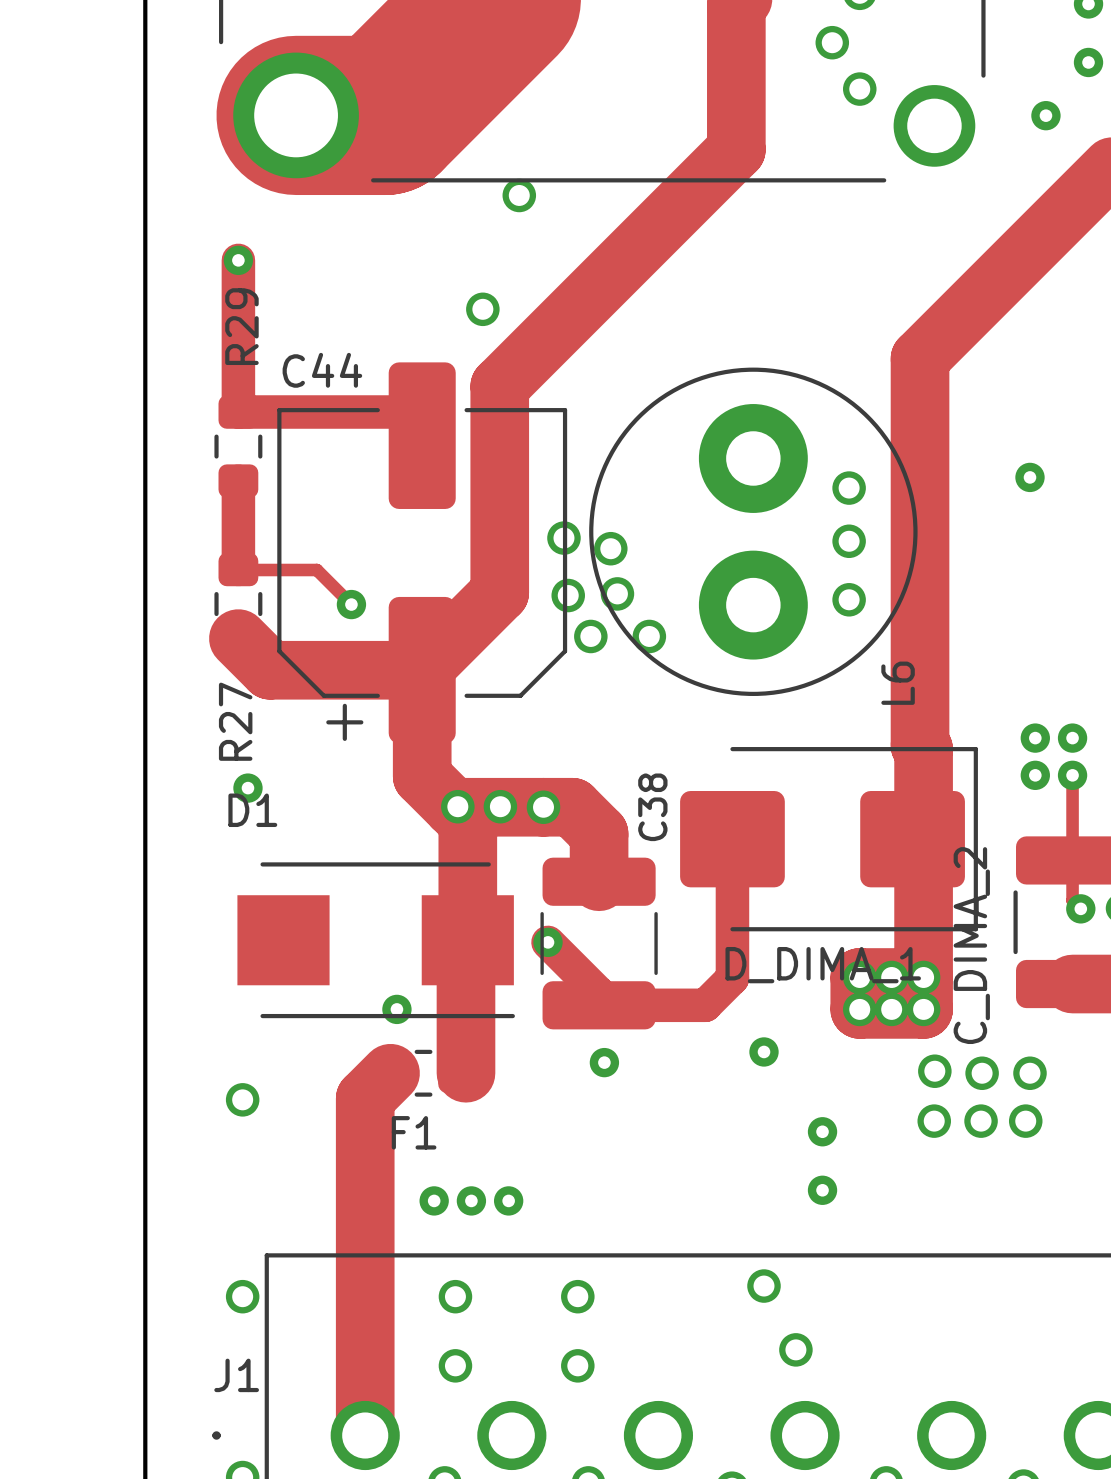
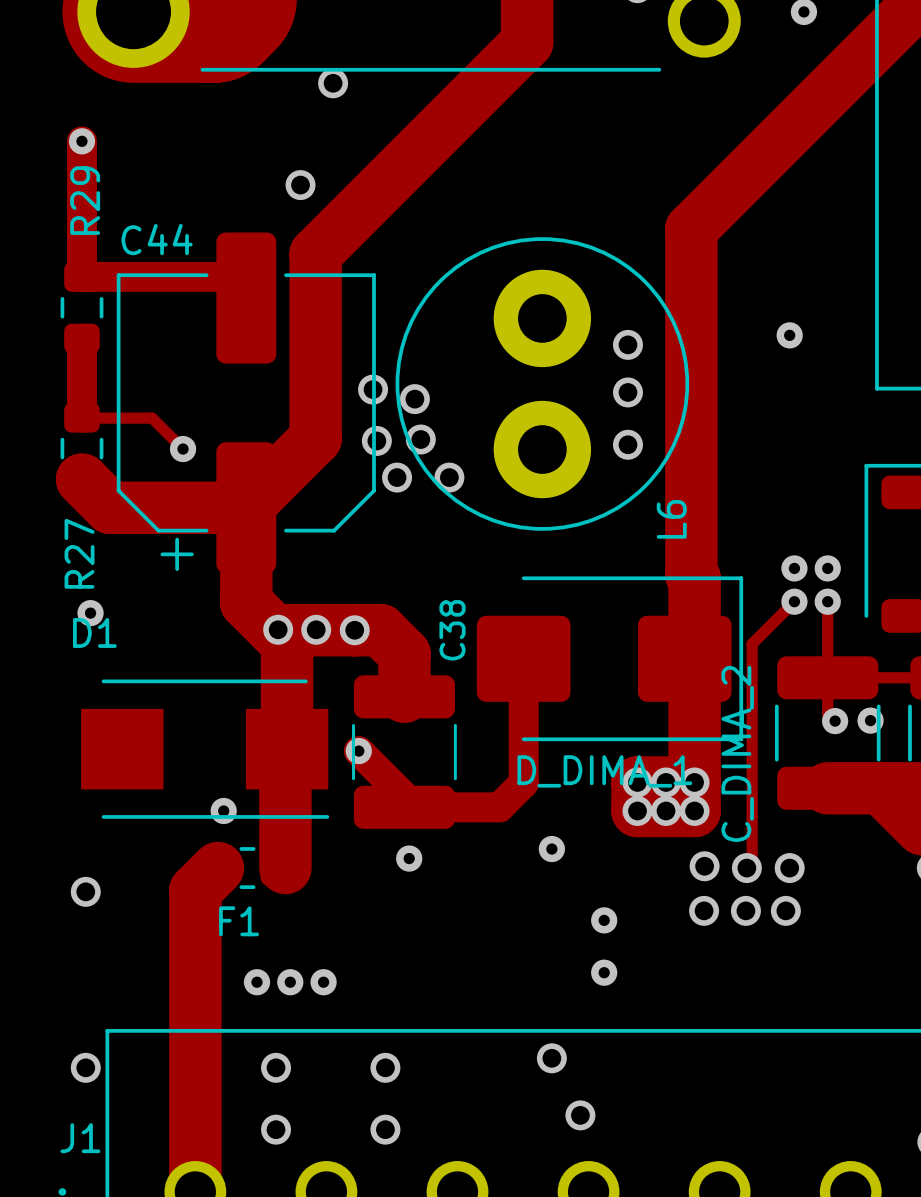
track: none -> (794, 601) (752, 644) (752, 862) (746, 868)

